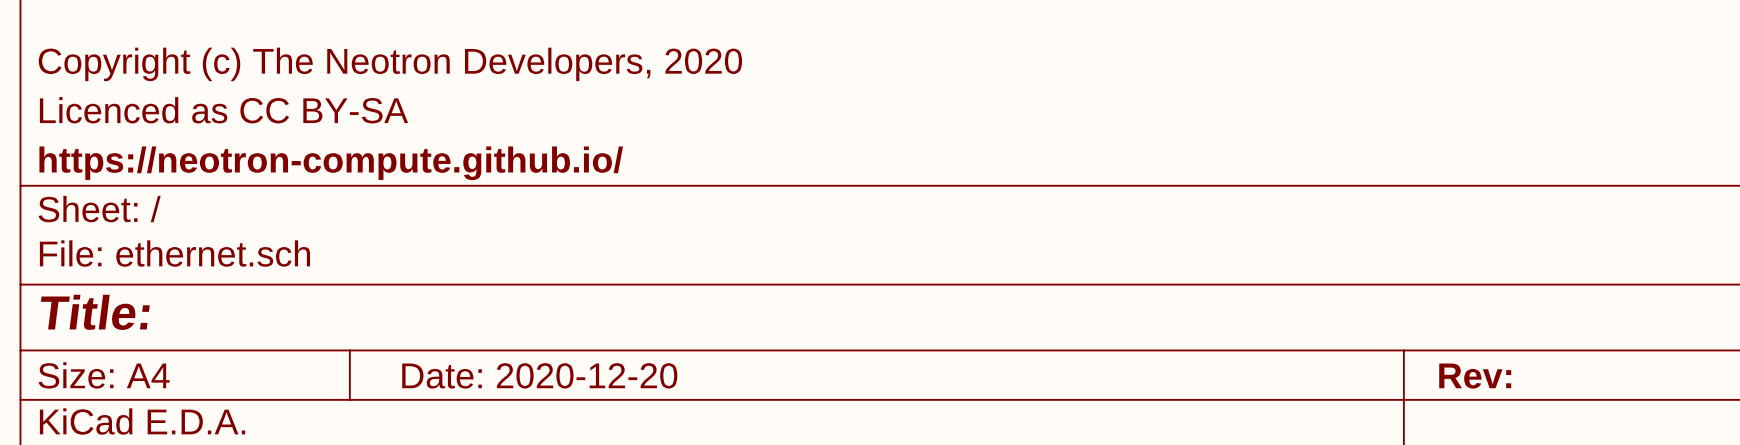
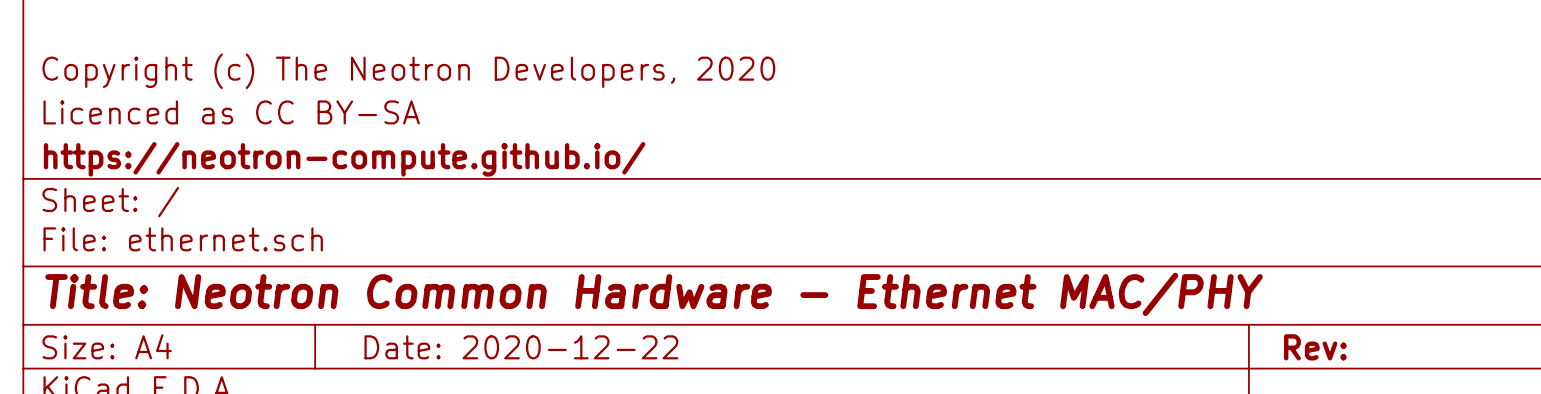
title block: Title: (95, 312) -> Title: Neotron Common Hardware - Ethernet MAC/PHY (654, 294)
title block: Date: 2020-12-20 (539, 375) -> Date: 2020-12-22 (521, 347)

